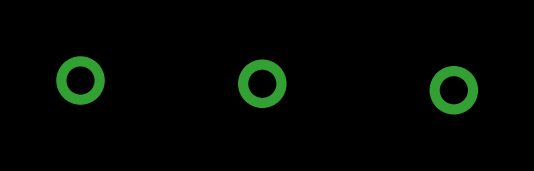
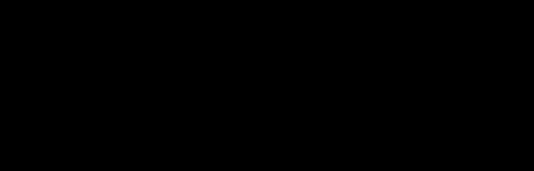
part: (80, 80) -> none
part: (262, 83) -> none
part: (453, 90) -> none

